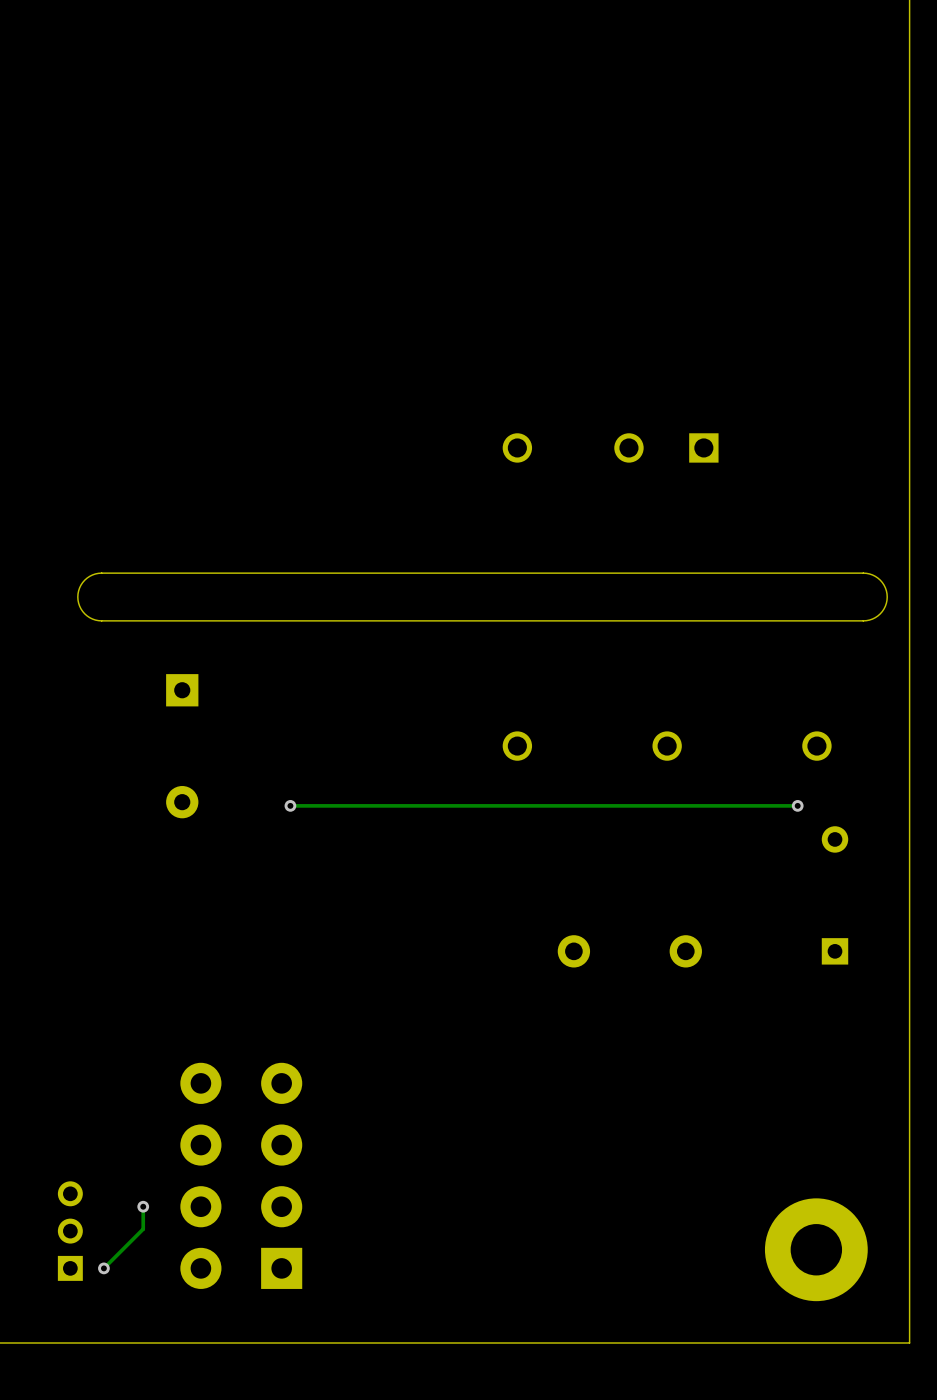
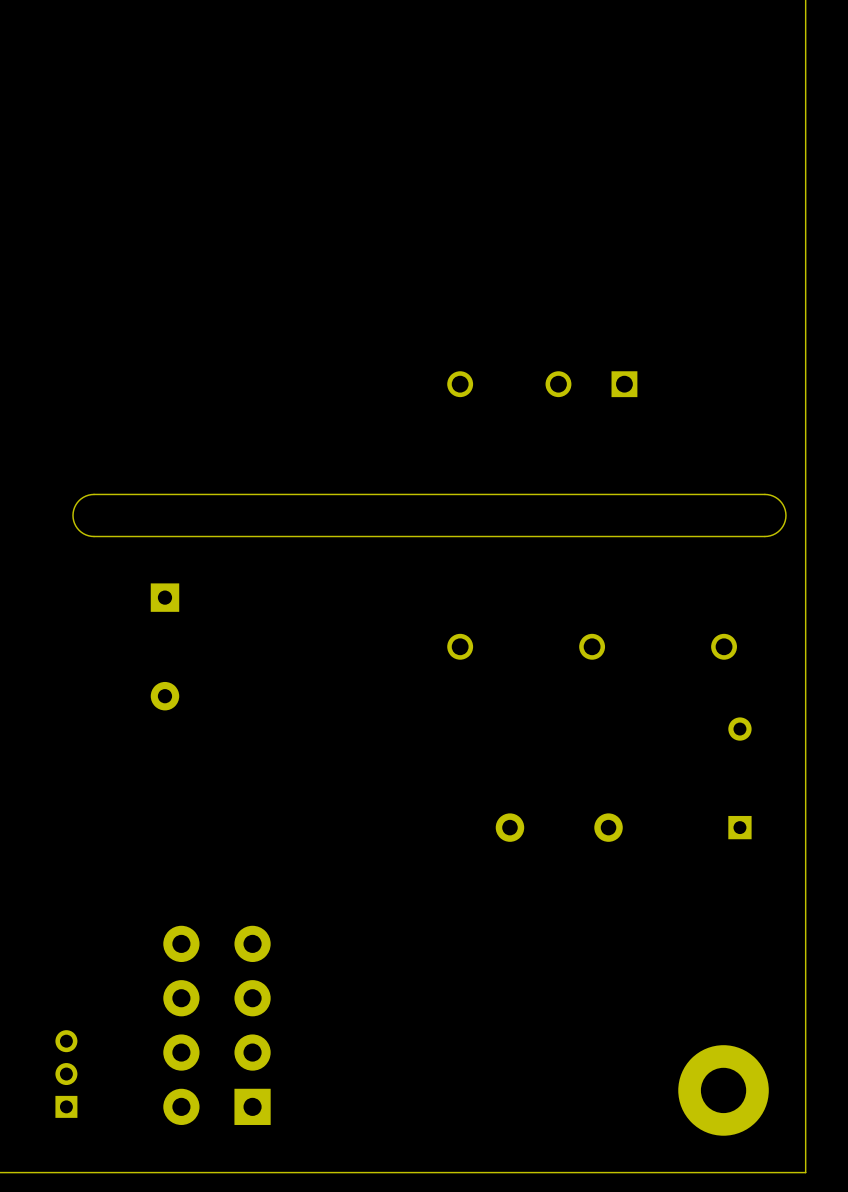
via: (290, 805) -> none
track: (797, 805) (290, 805) -> none
via: (797, 805) -> none
track: (143, 1206) (143, 1229) (103, 1268) -> none
via: (143, 1206) -> none
via: (103, 1268) -> none

